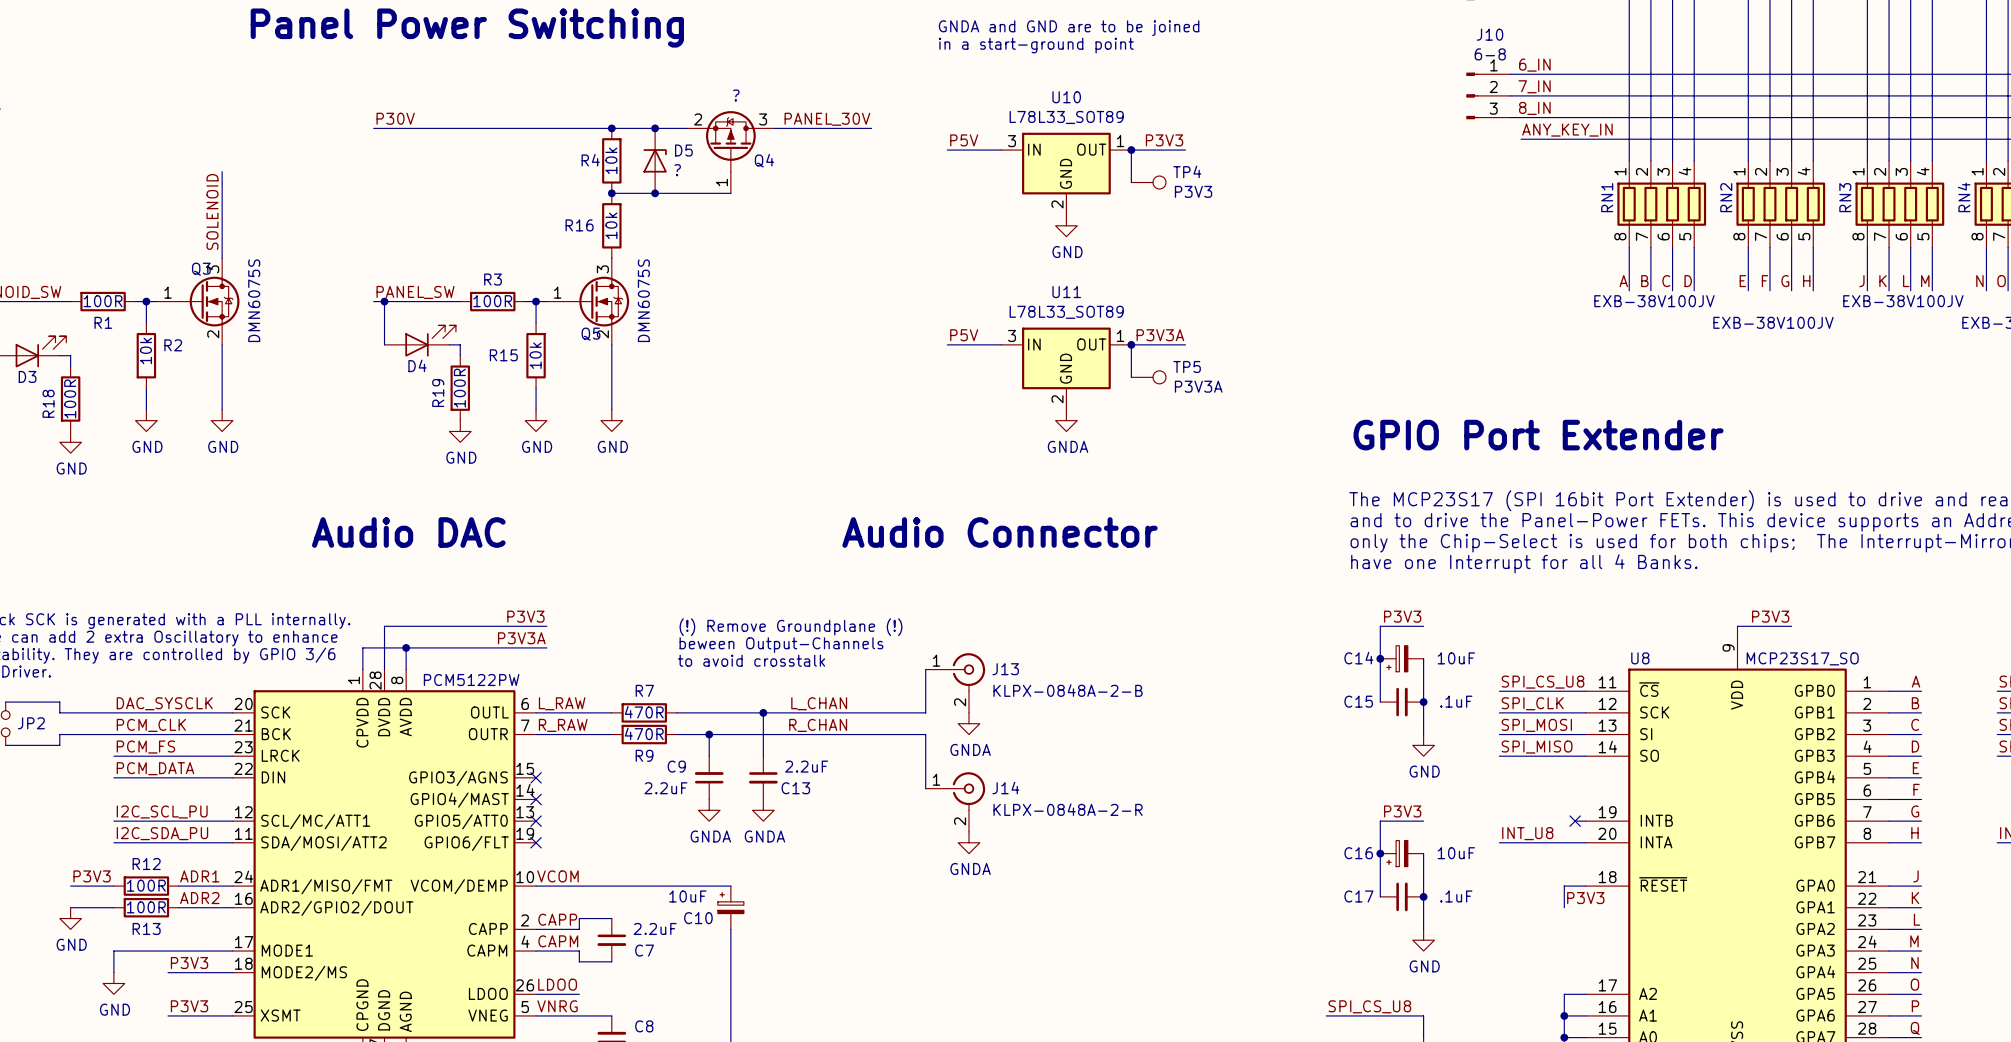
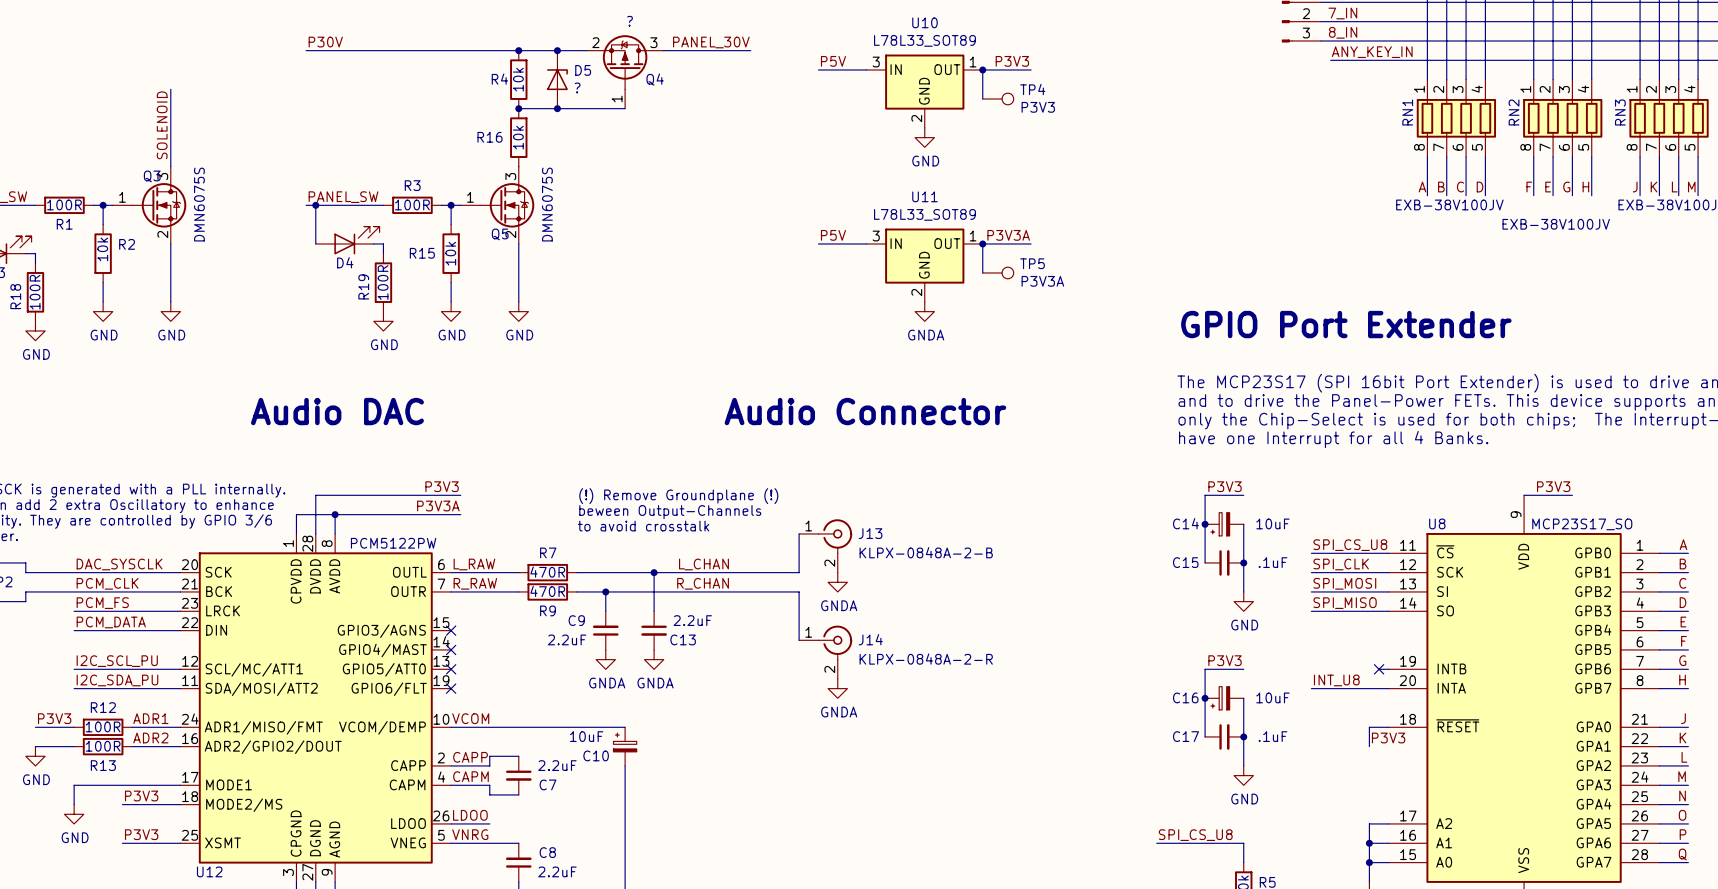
label: E (1742, 281) -> F (1529, 187)
label: F (1764, 281) -> E (1548, 187)

